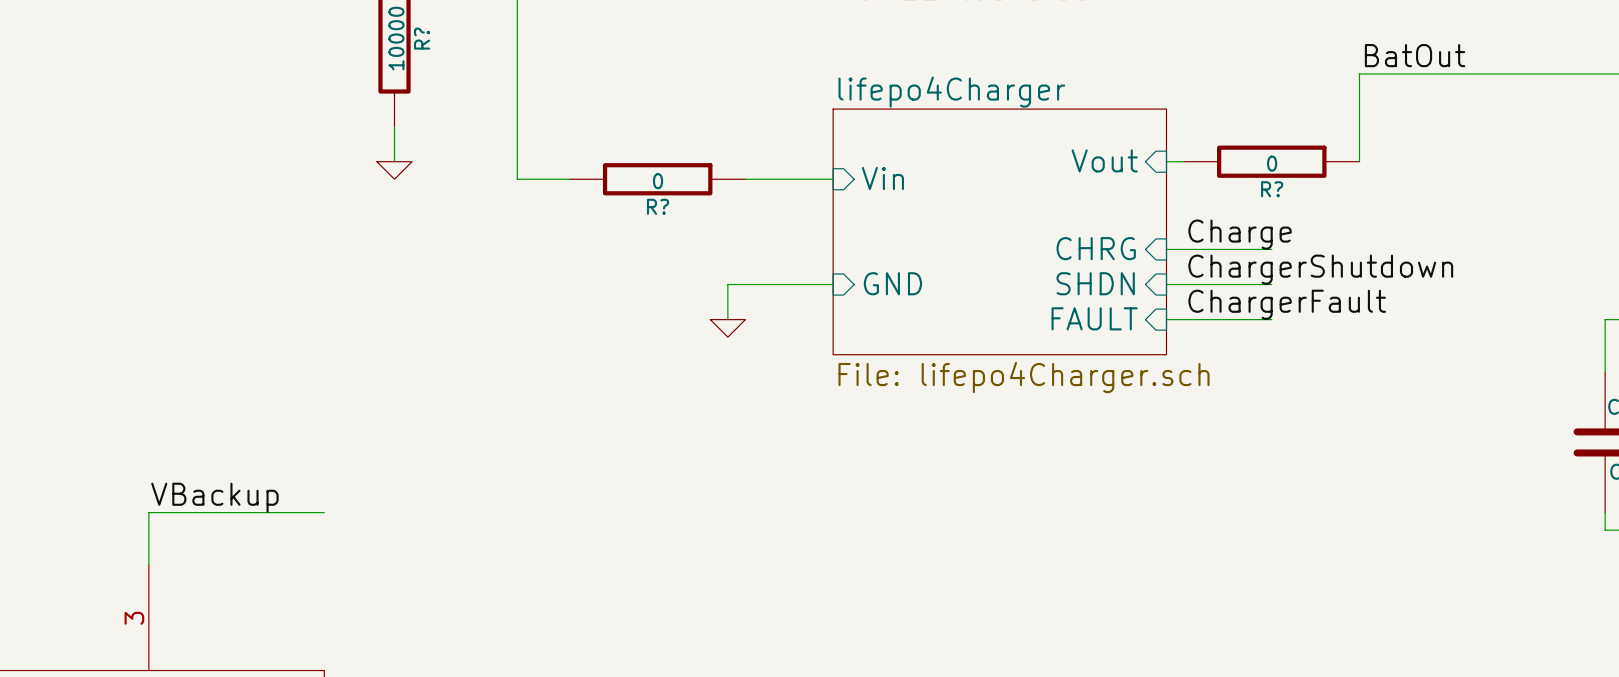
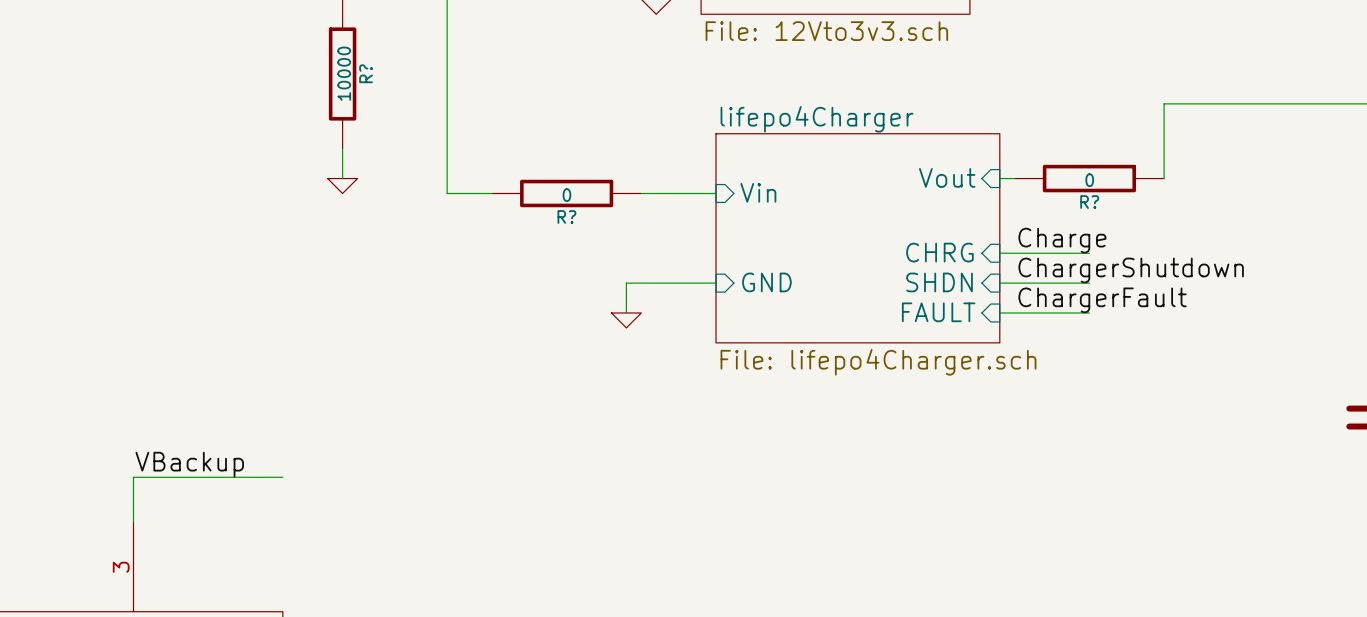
label: BatOut (1415, 55) -> none

